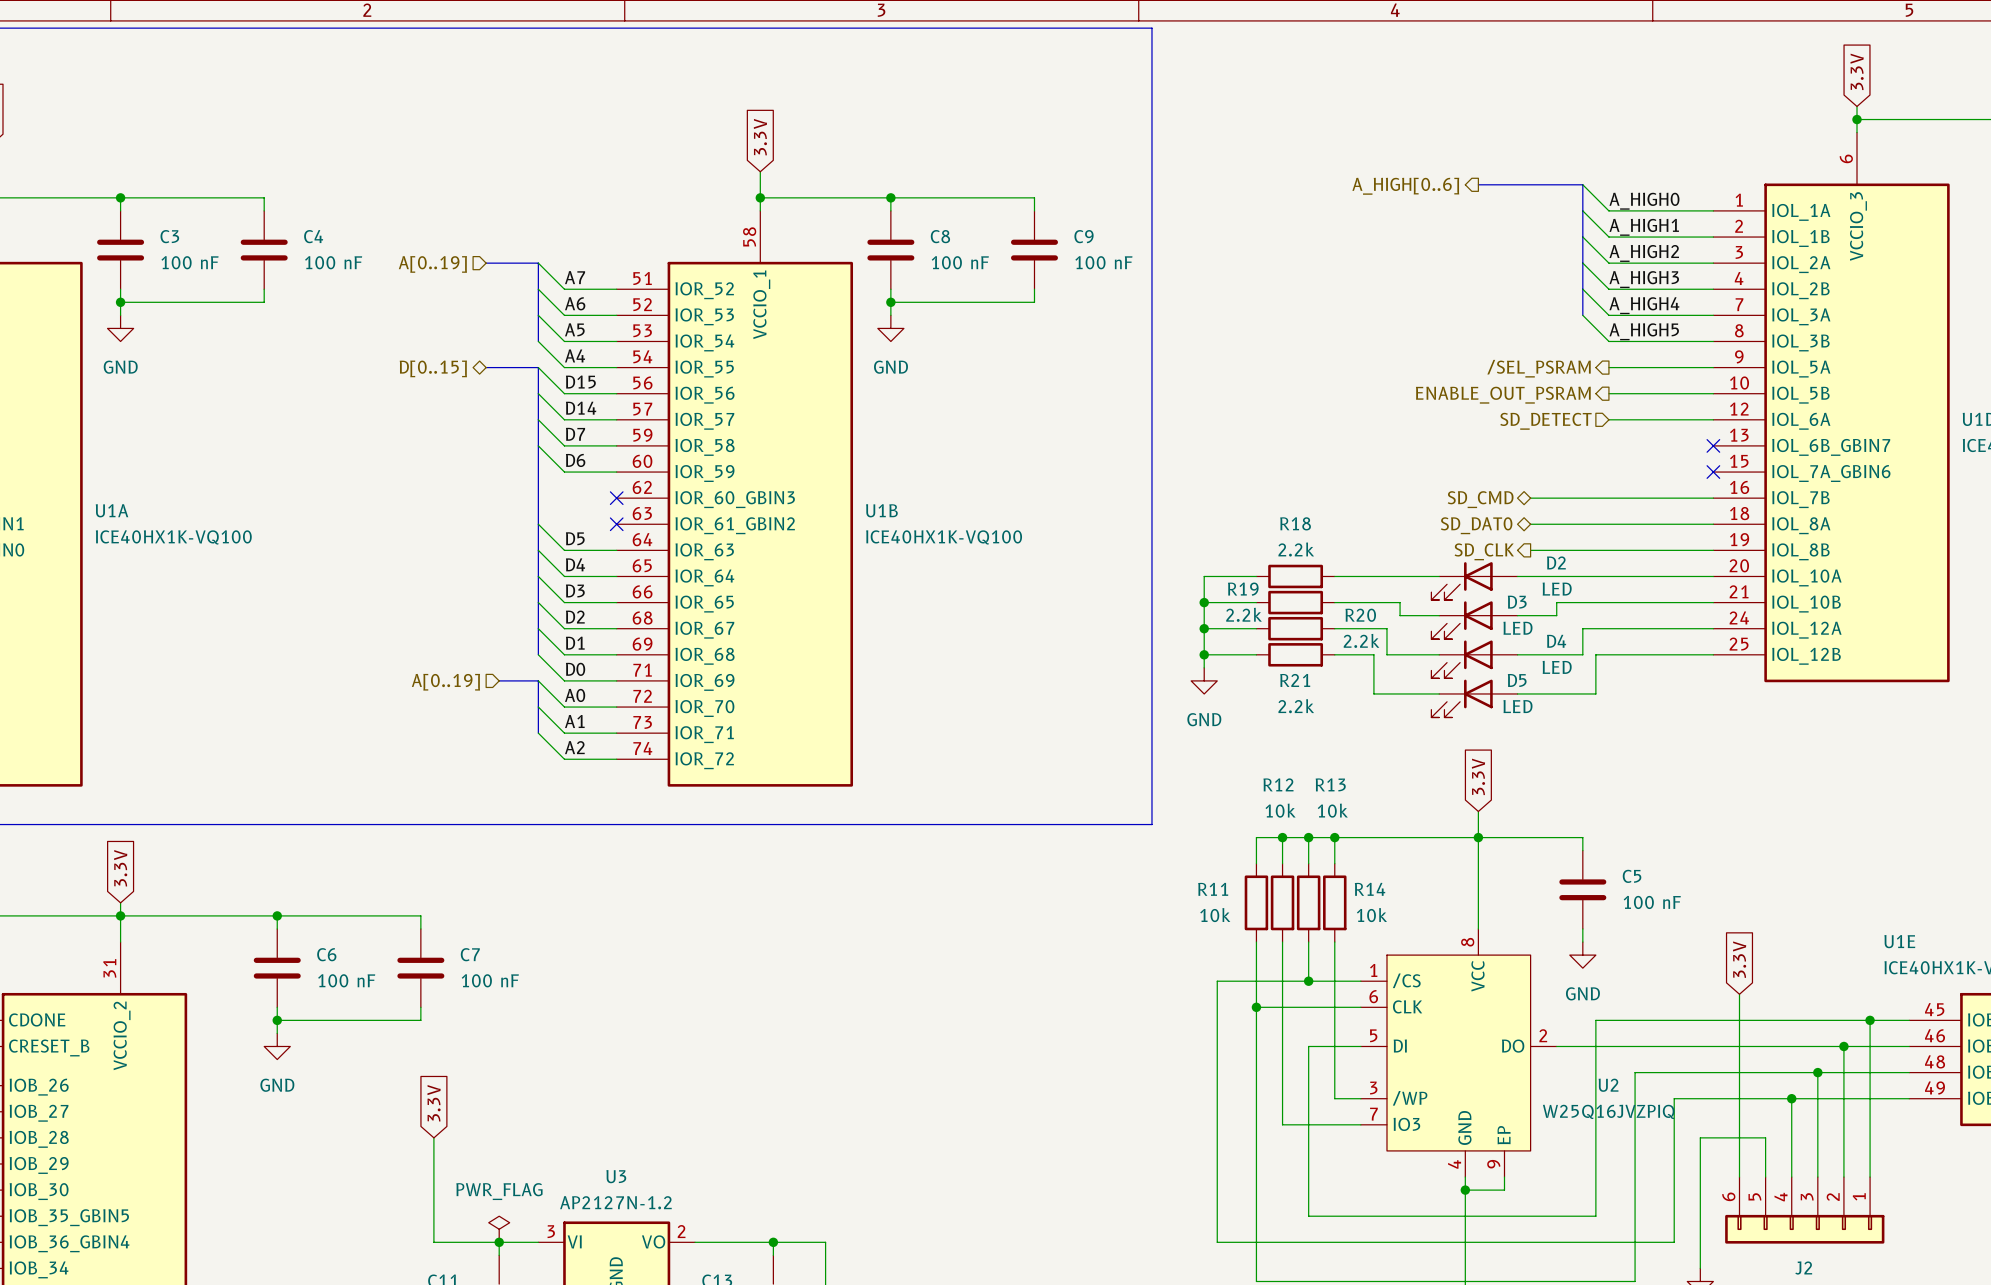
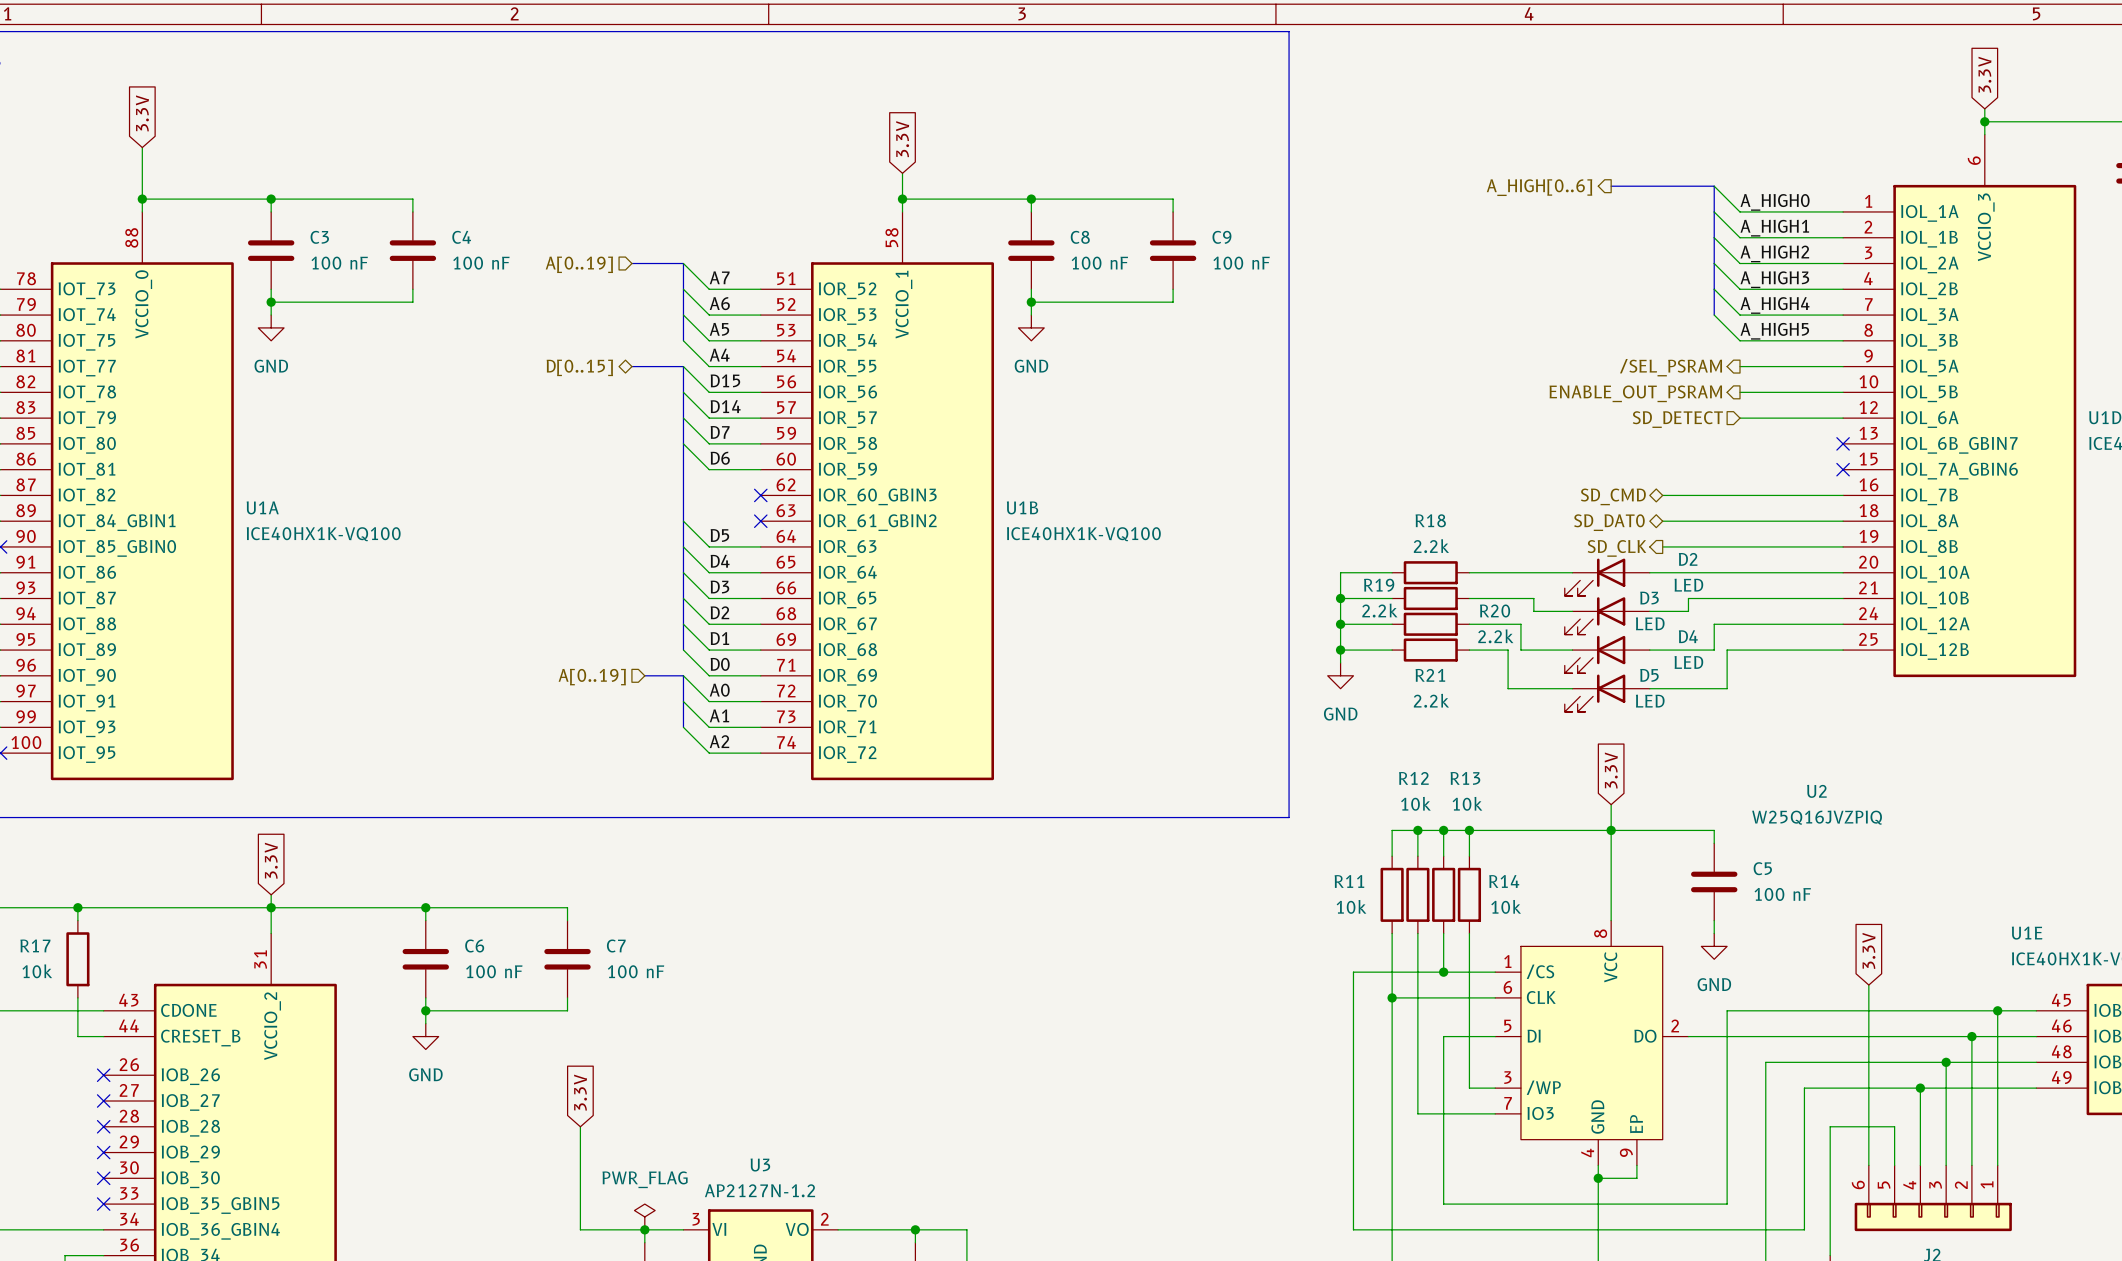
U2 name position: U2 (1608, 1085) -> U2 (1816, 791)
U2 value position: W25Q16JVZPIQ (1608, 1111) -> W25Q16JVZPIQ (1817, 817)

